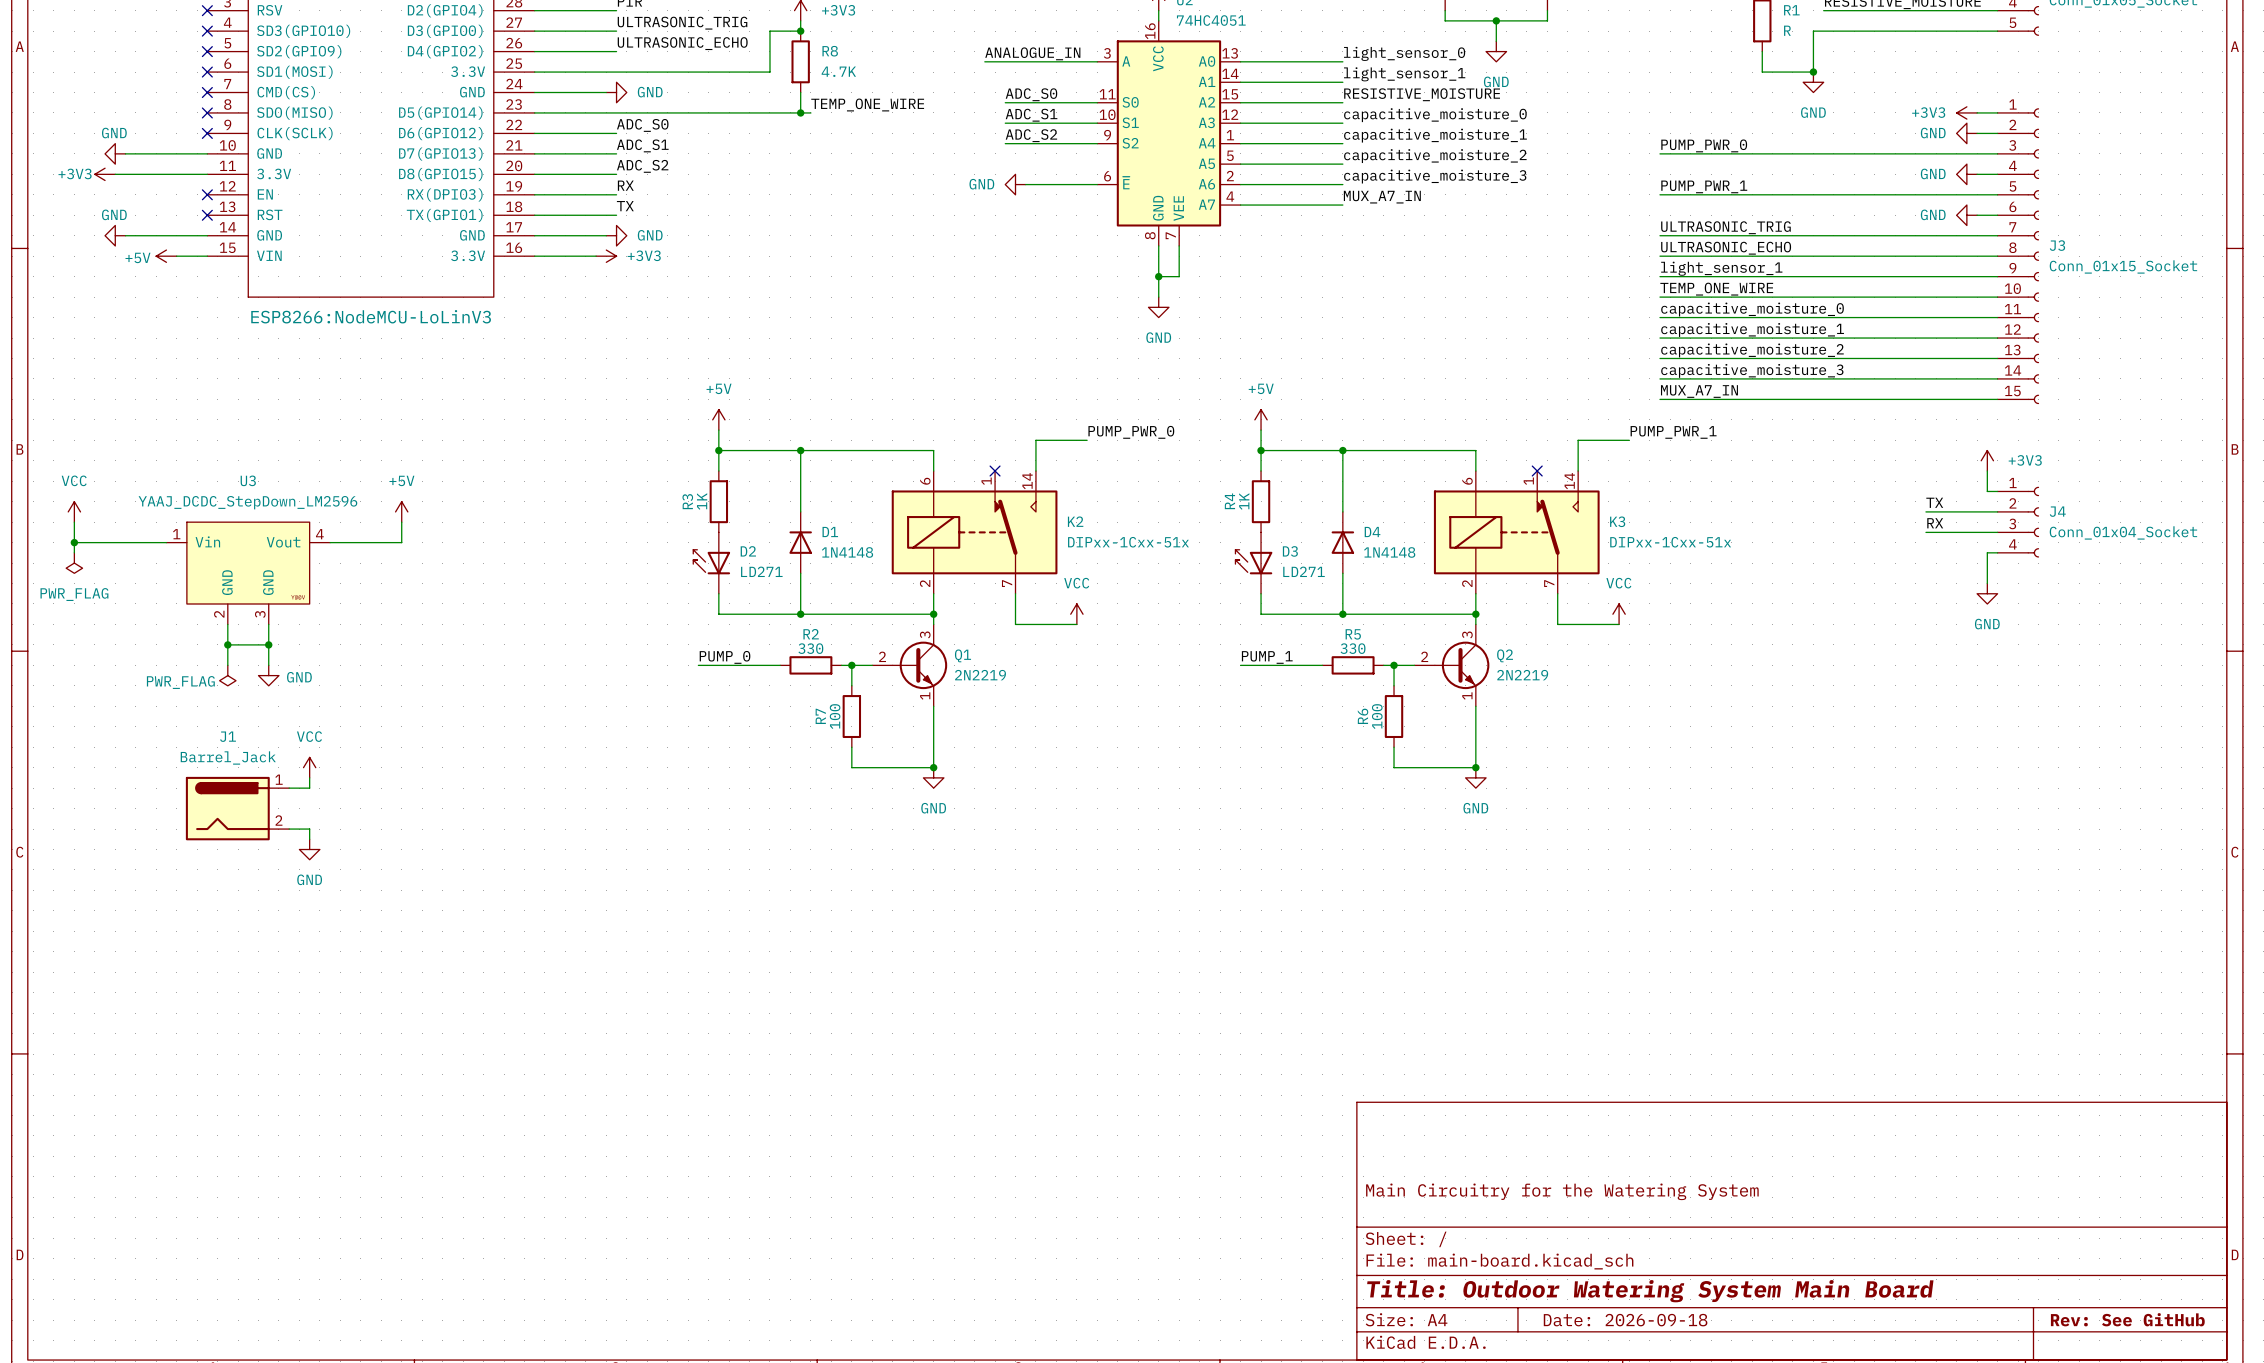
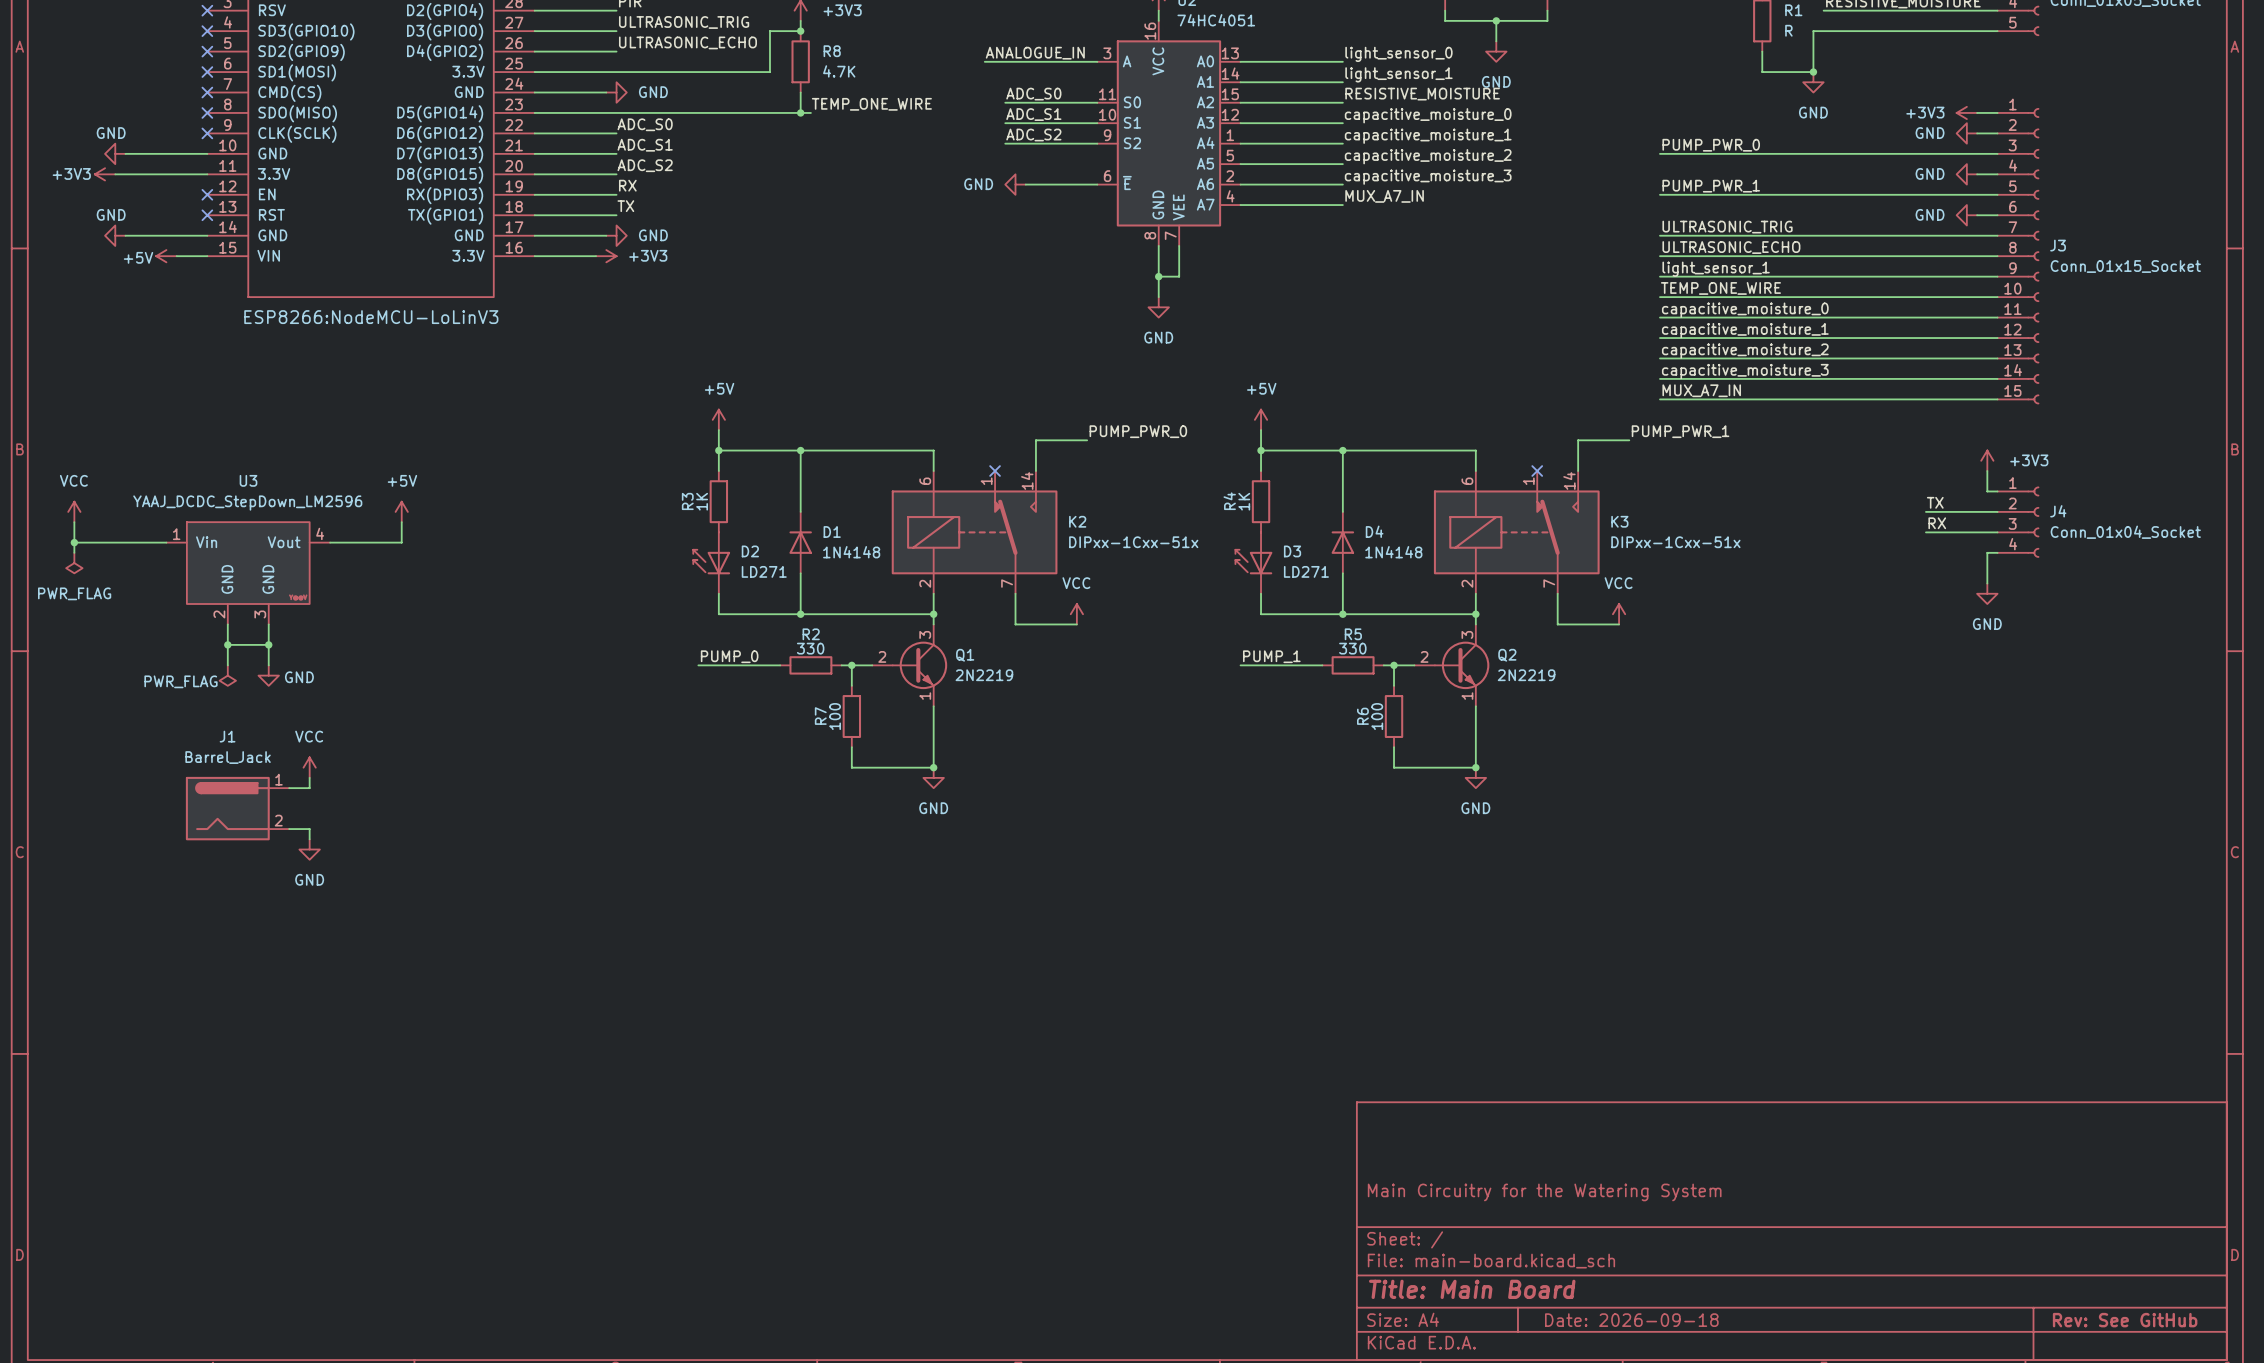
title block: Title: Outdoor Watering System Main Board (1650, 1291) -> Title: Main Board (1472, 1289)

